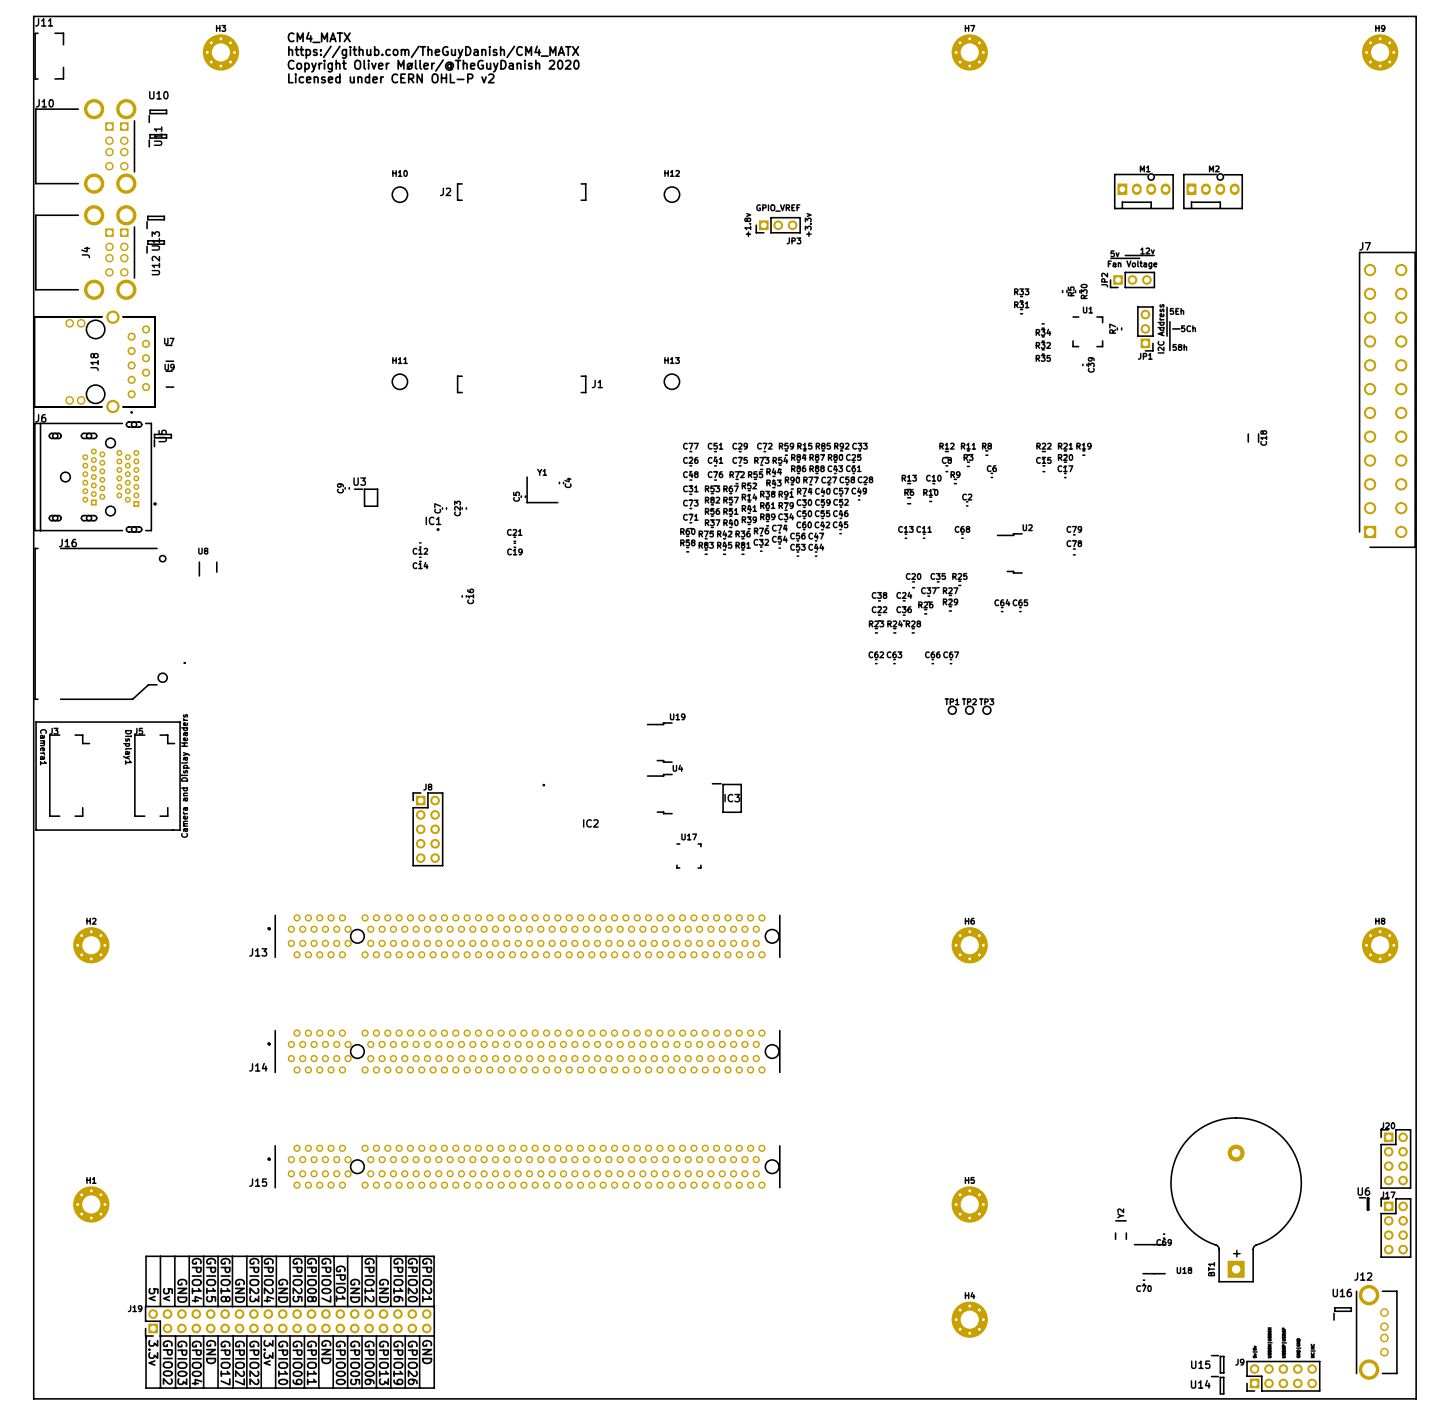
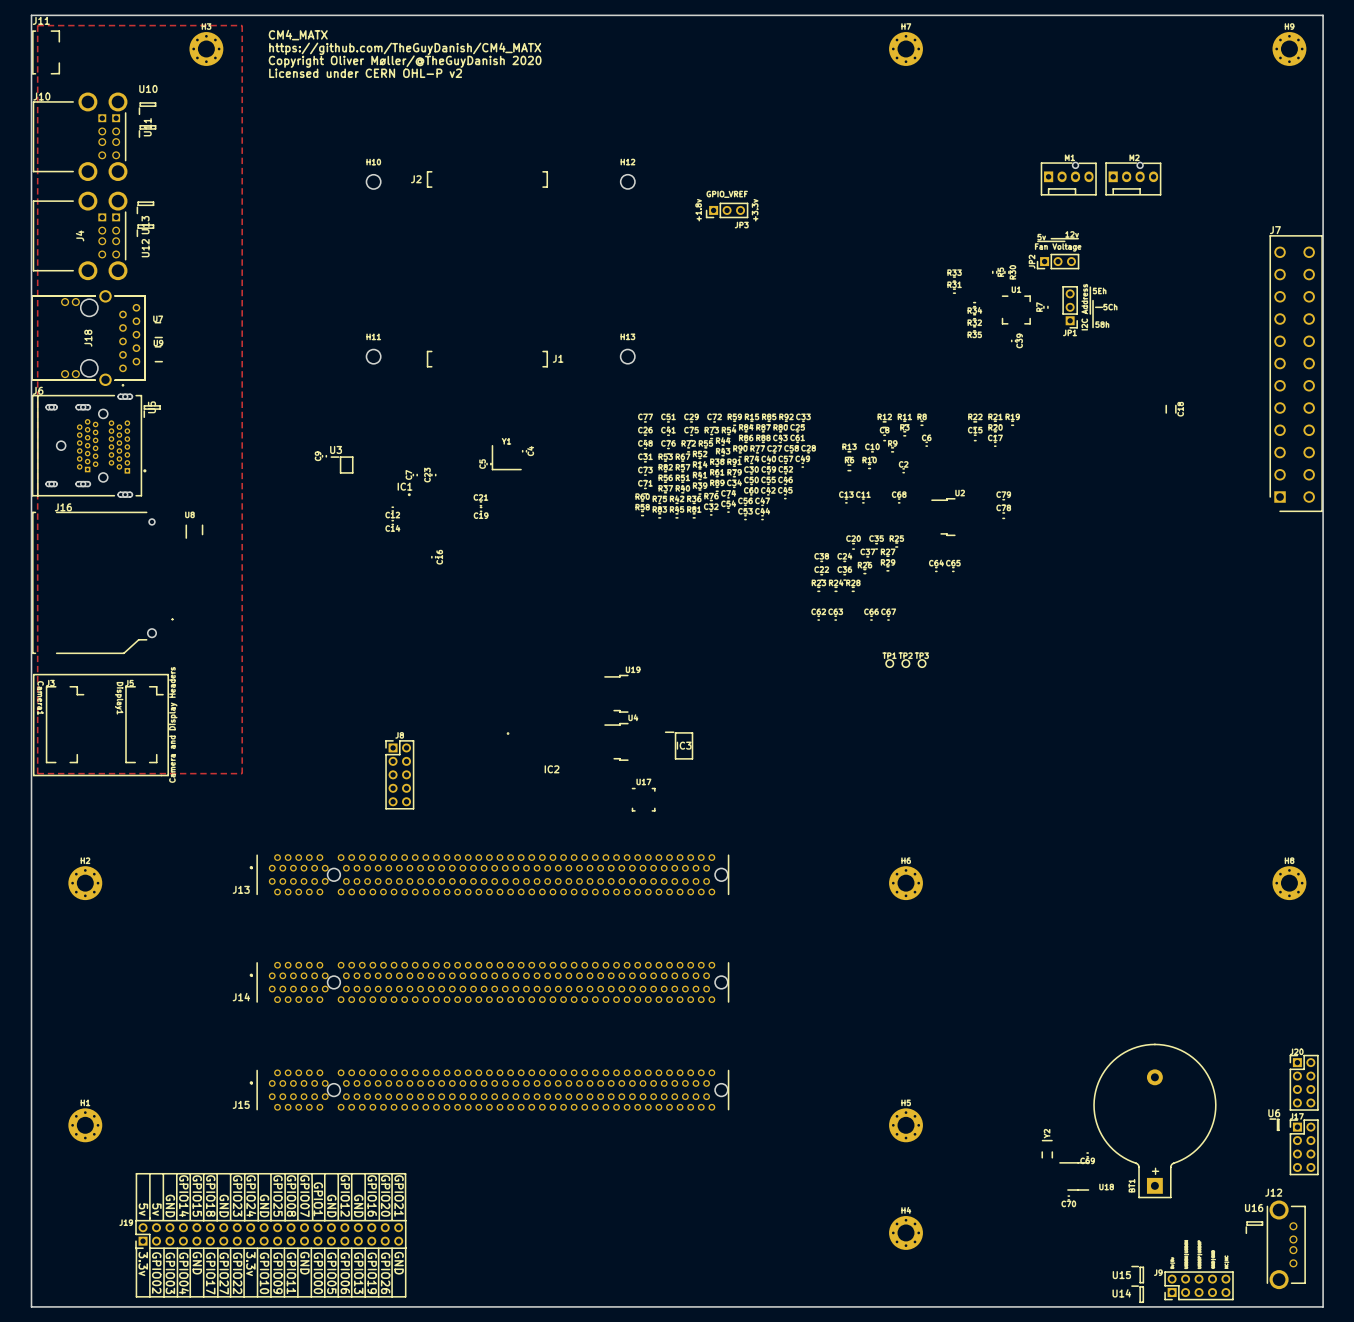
zone outline: none -> (37, 25) (37, 773) (242, 773) (242, 25) (37, 25)

